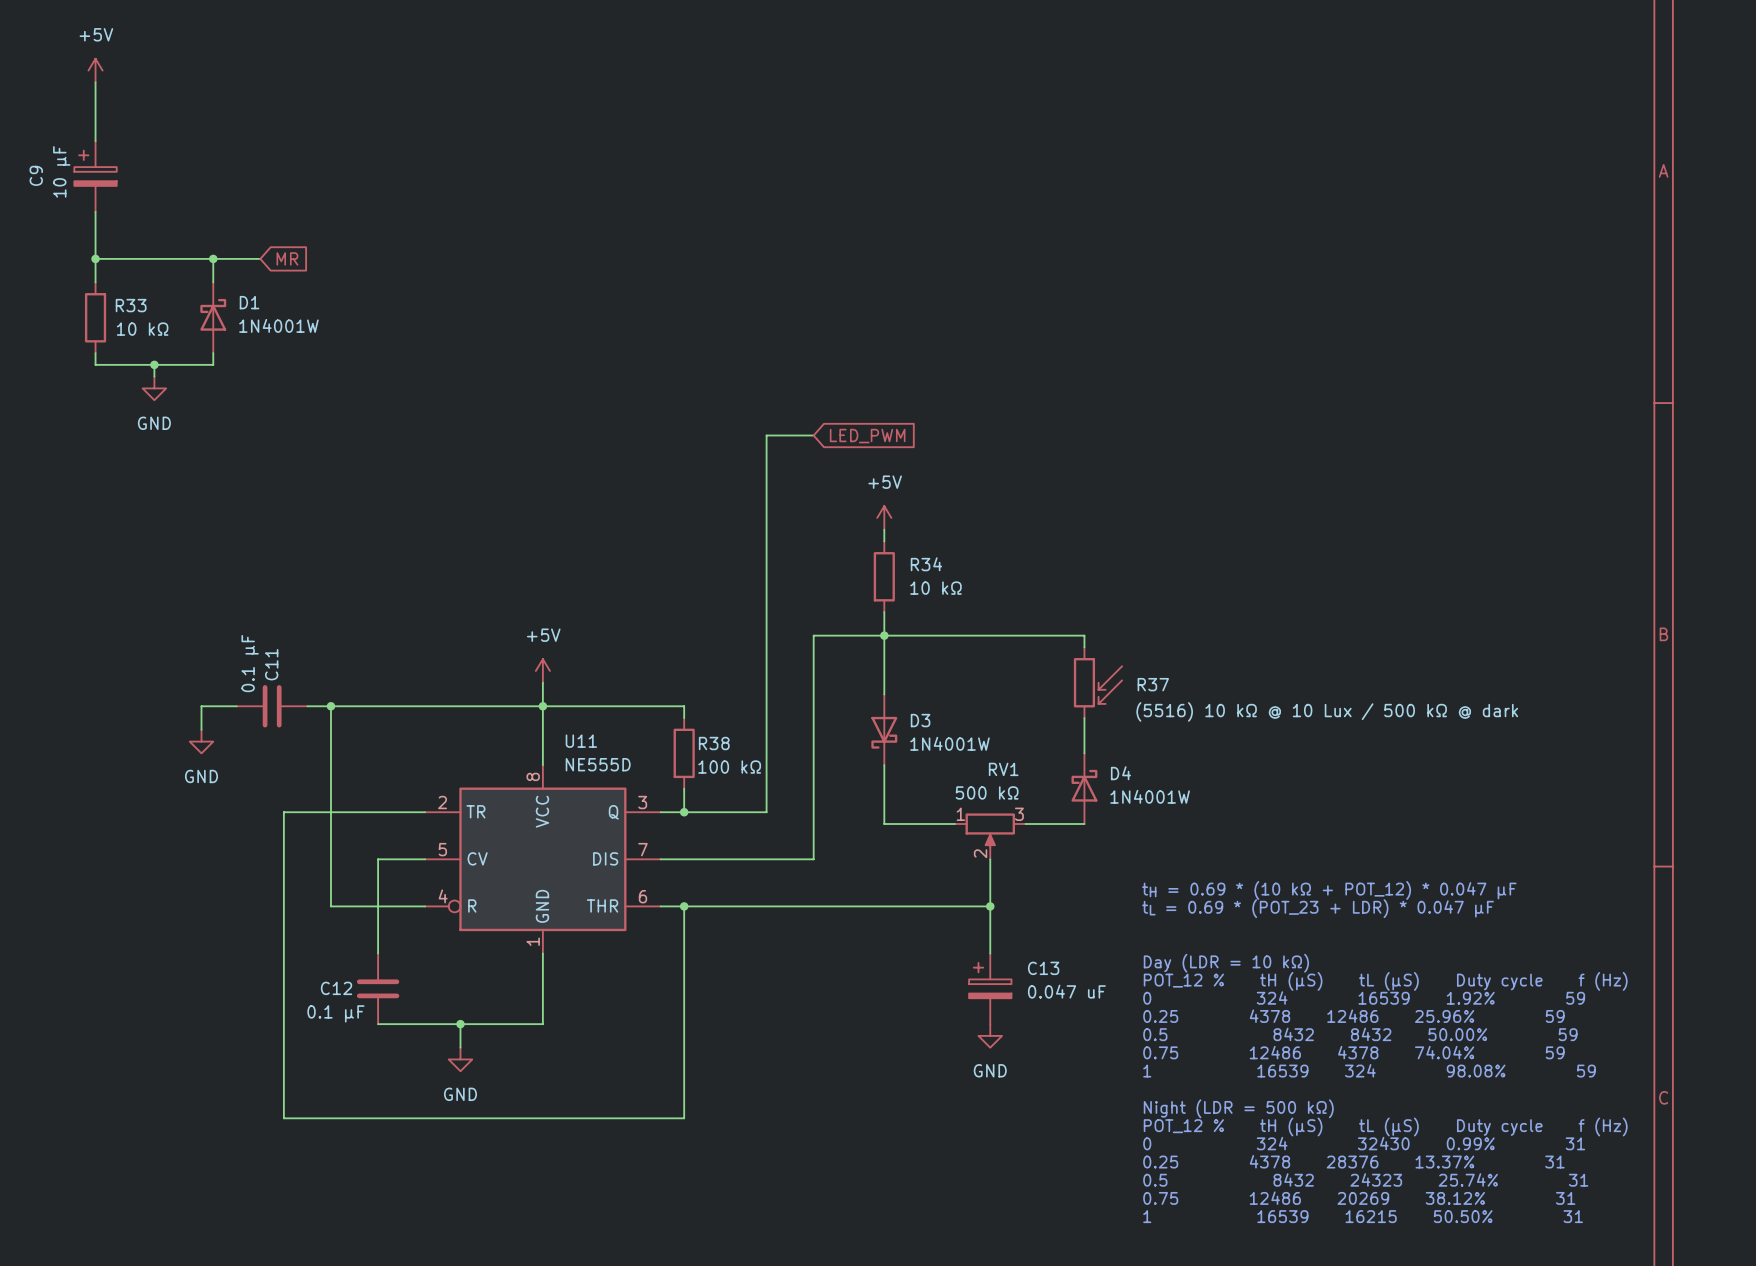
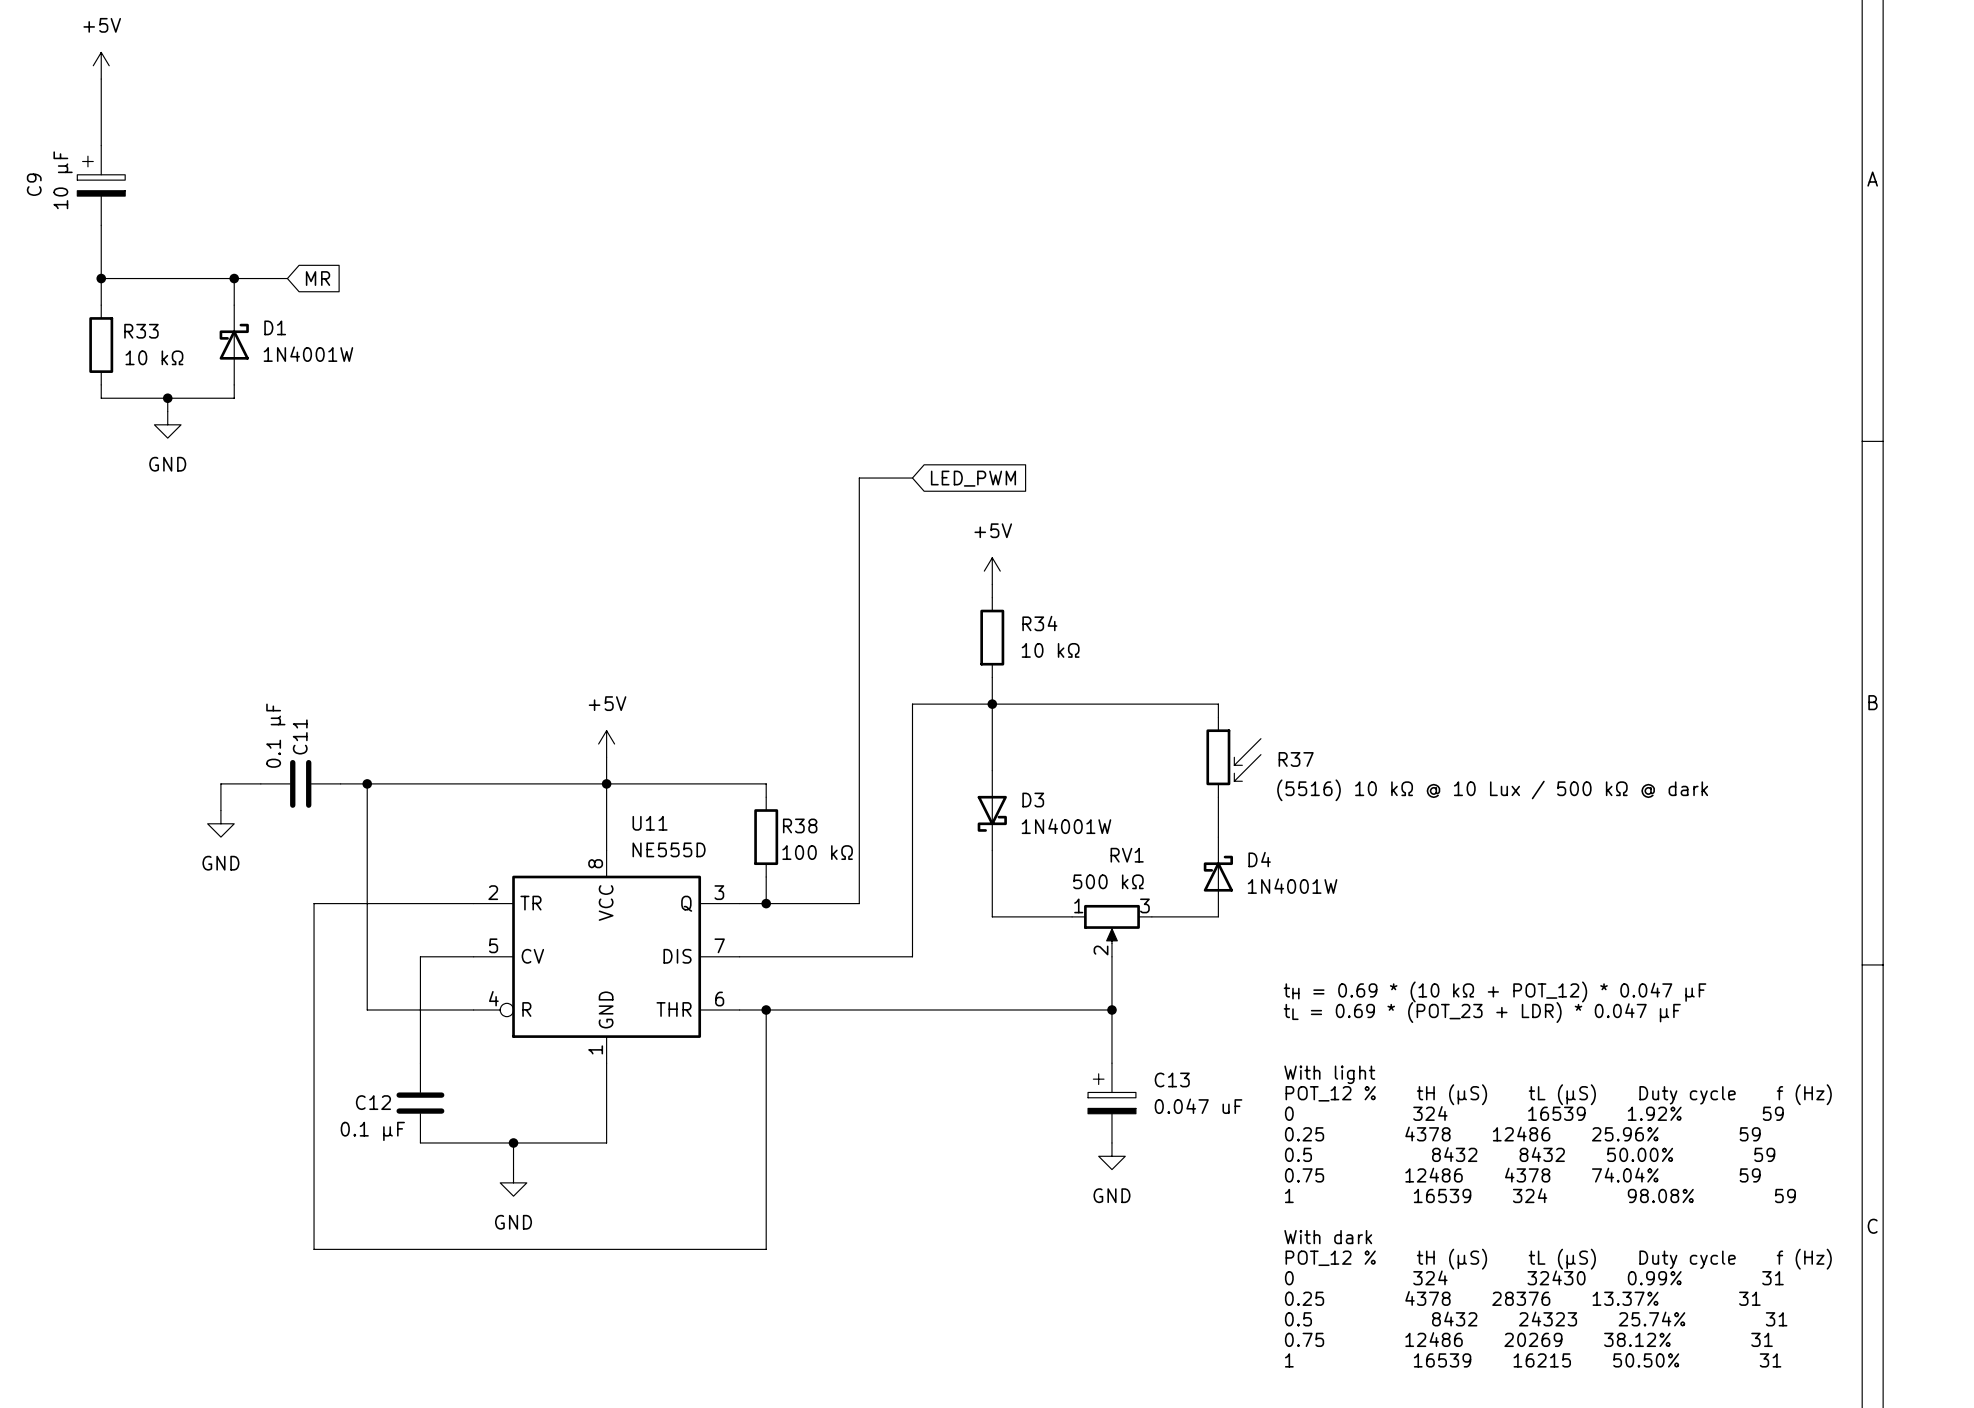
text: Day (LDR = 10 kΩ) (1226, 963) -> With light (1329, 1074)
text: Night (LDR = 500 kΩ) (1238, 1108) -> With dark (1328, 1237)

